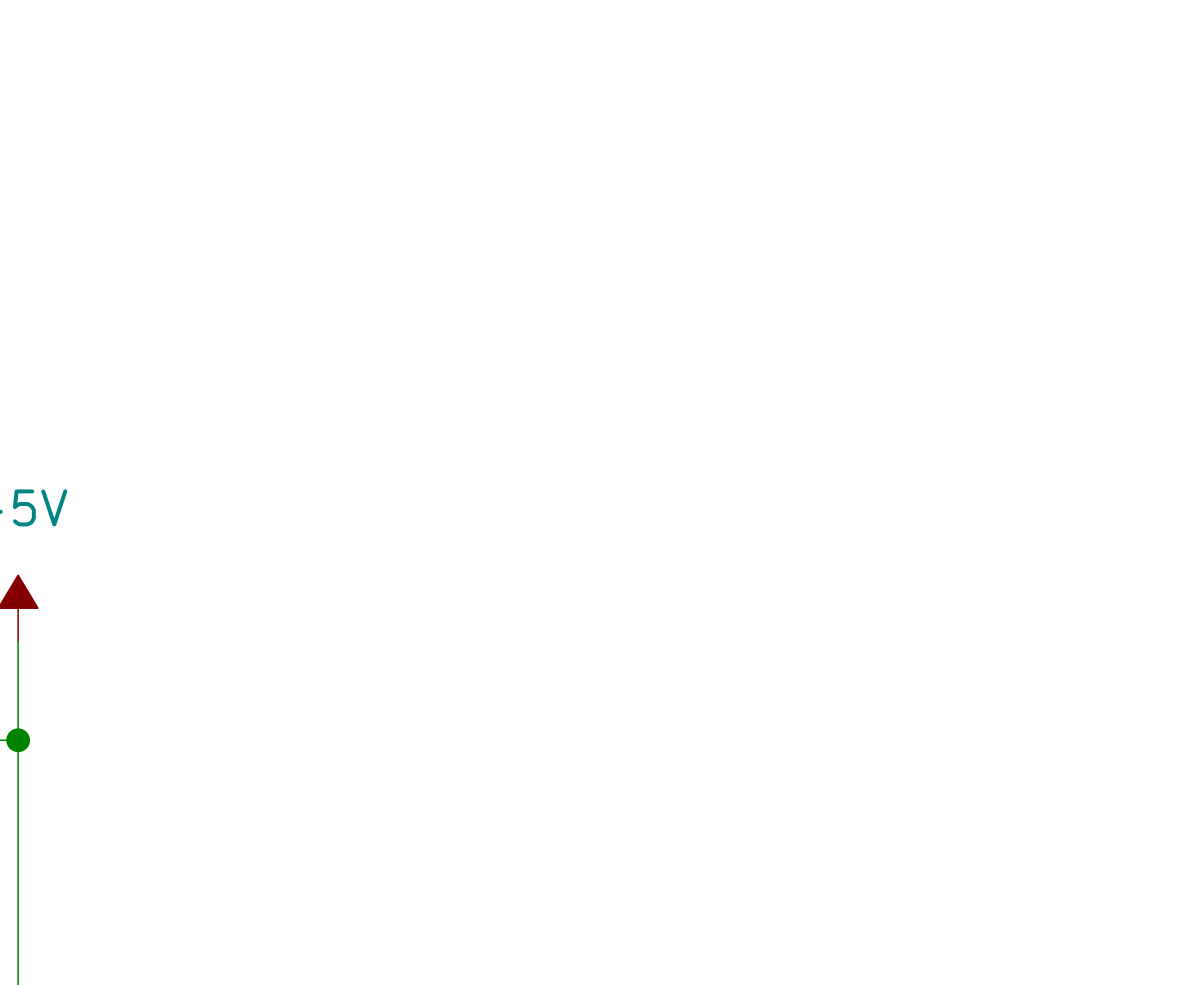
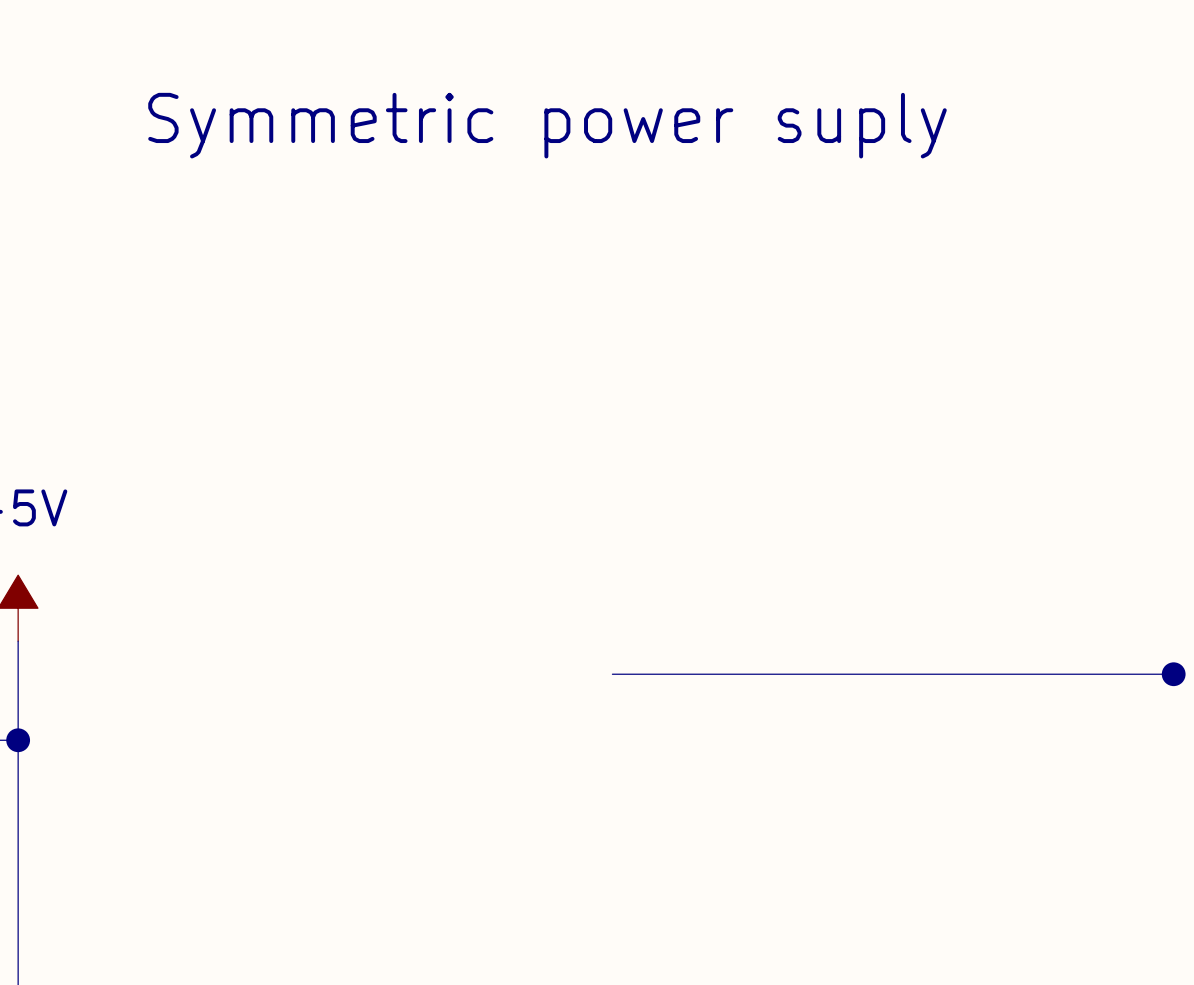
text: none -> Symmetric power suply (547, 125)
wire: none -> (612, 674) (1173, 674)
junction: none -> (1173, 674)

